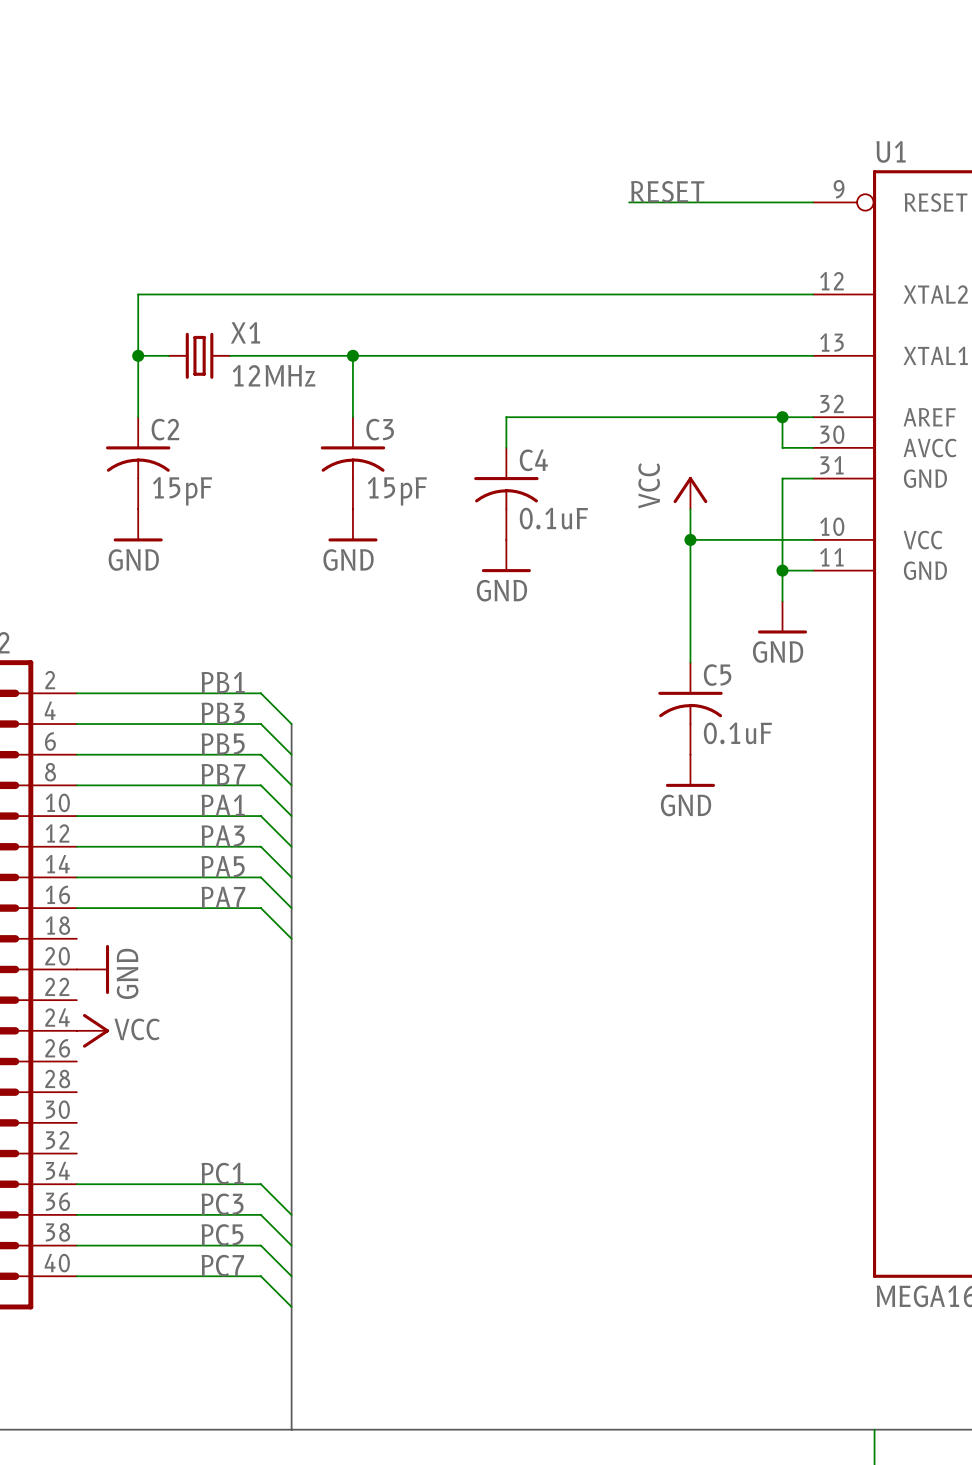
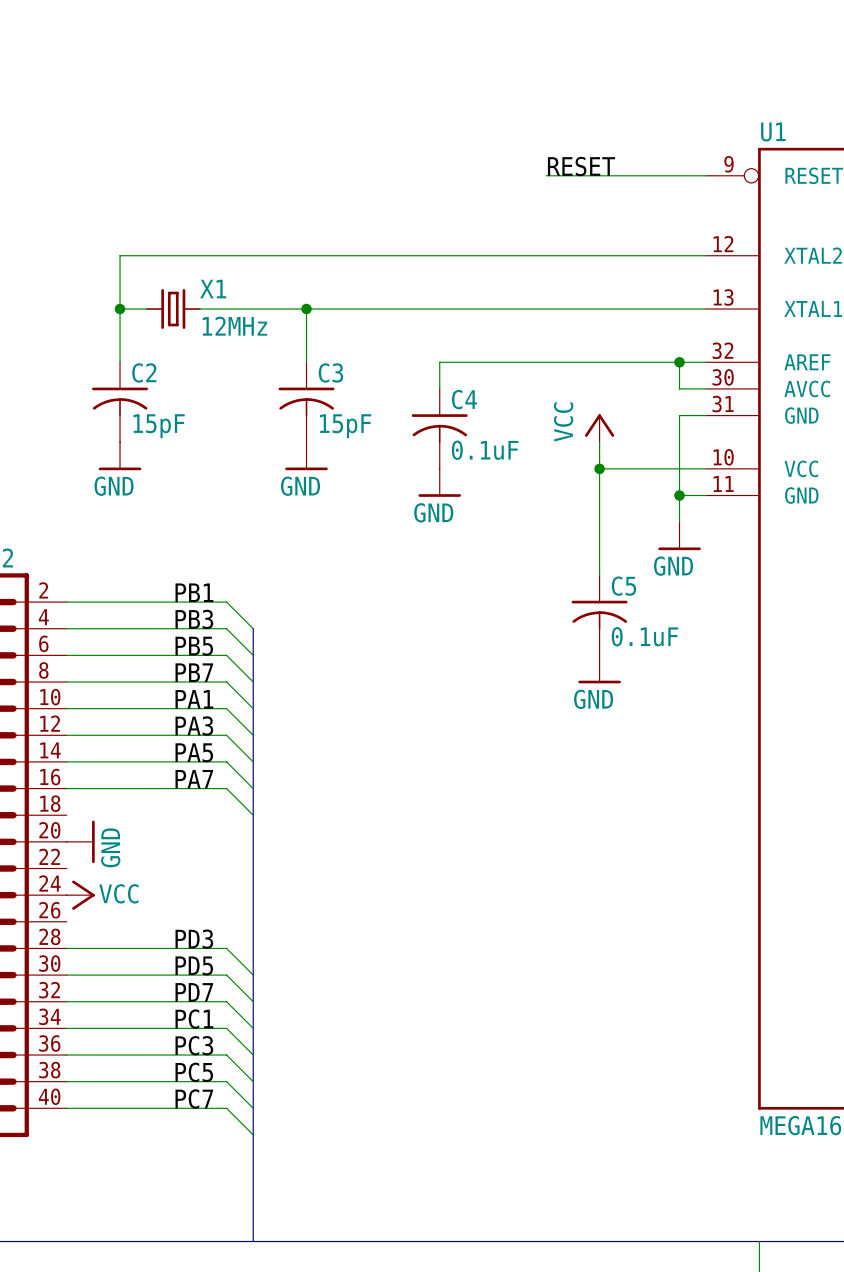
label: none -> PD3 (194, 939)
wire: none -> (66, 948) (226, 948) (253, 975)
label: none -> PD5 (194, 965)
wire: none -> (66, 975) (226, 975) (253, 1001)
label: none -> PD7 (194, 992)
wire: none -> (66, 1001) (226, 1001) (253, 1028)

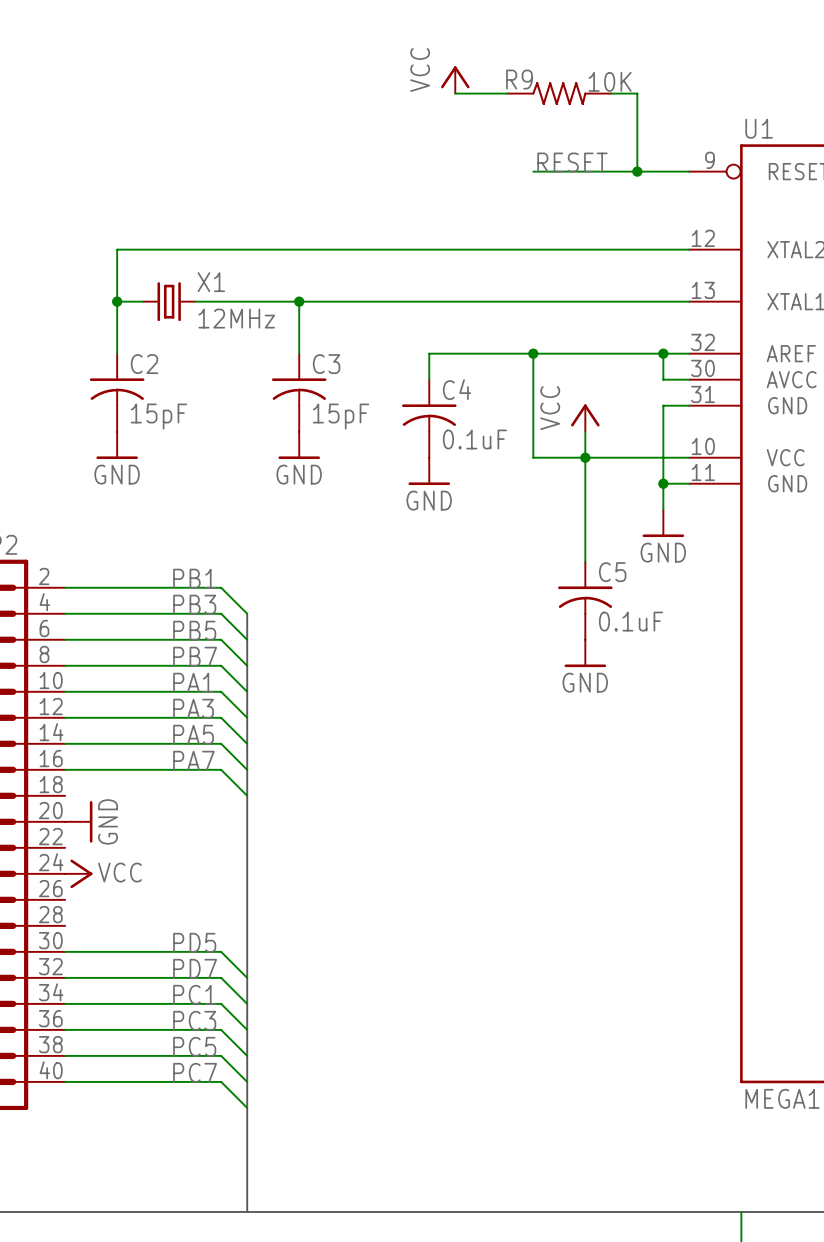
power symbol: none -> VCC (455, 79)
wire: none -> (455, 93) (507, 93)
R9: none -> 10K (559, 93)
wire: none -> (611, 93) (637, 93) (637, 171)
junction: none -> (637, 171)
wire: none -> (533, 353) (533, 457) (585, 457)
junction: none -> (533, 353)
label: PD3 (194, 939) -> none
wire: (66, 948) (226, 948) (253, 975) -> none

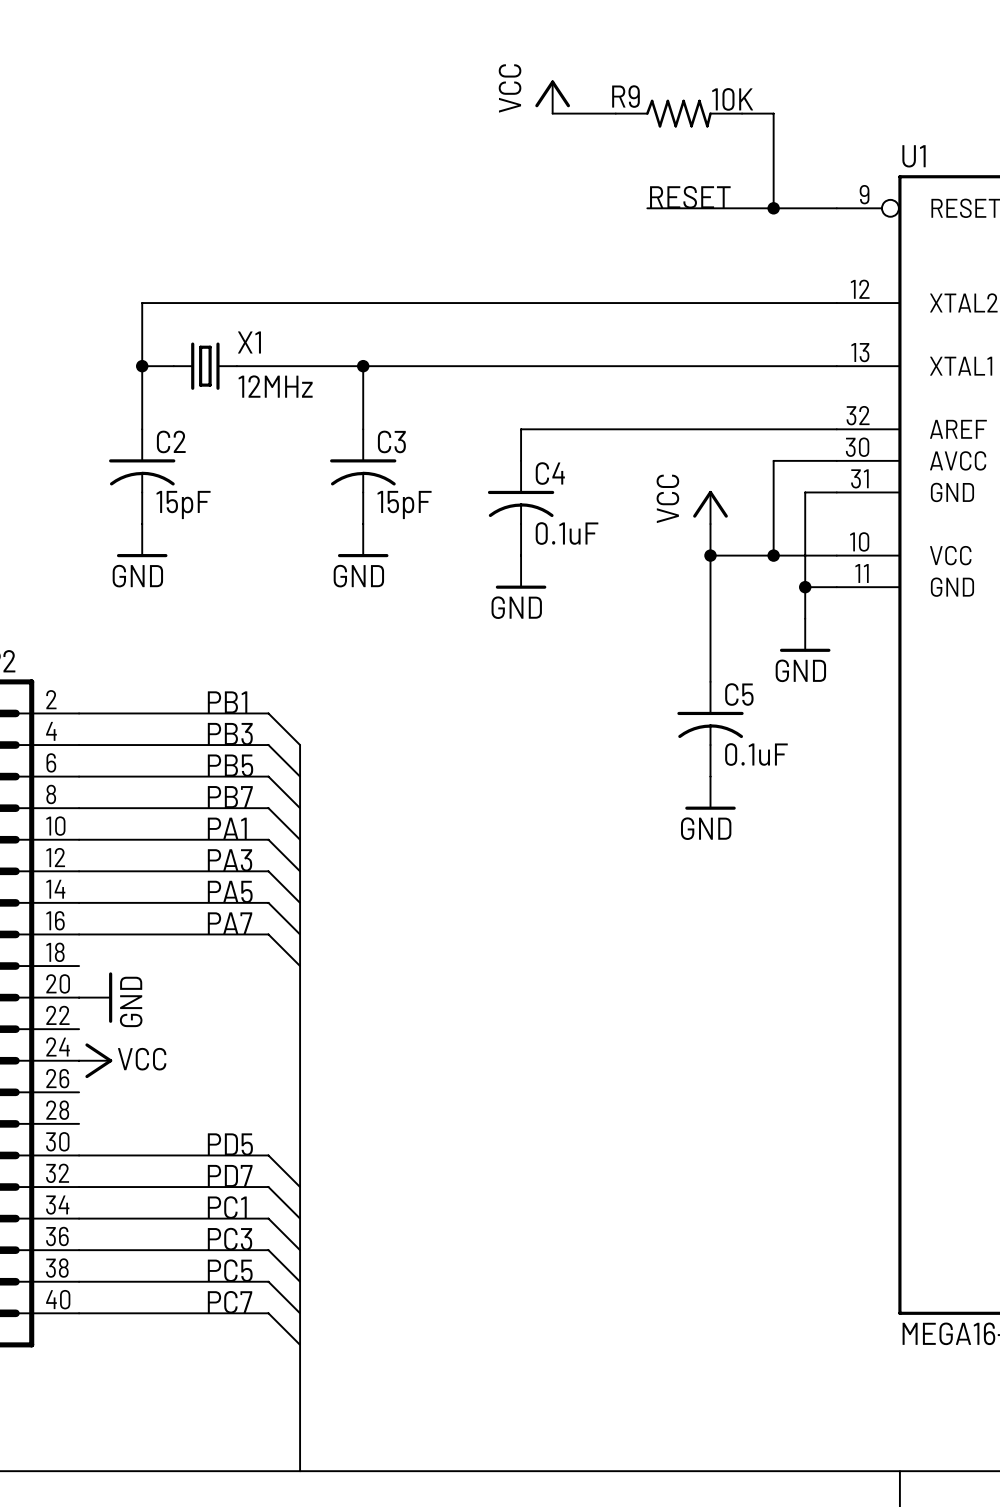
wire: (533, 353) (533, 457) (585, 457) -> none
junction: (533, 353) -> none
wire: (663, 353) (663, 379) -> (773, 555) (773, 460) (805, 460)
junction: (663, 353) -> none
junction: none -> (773, 555)

